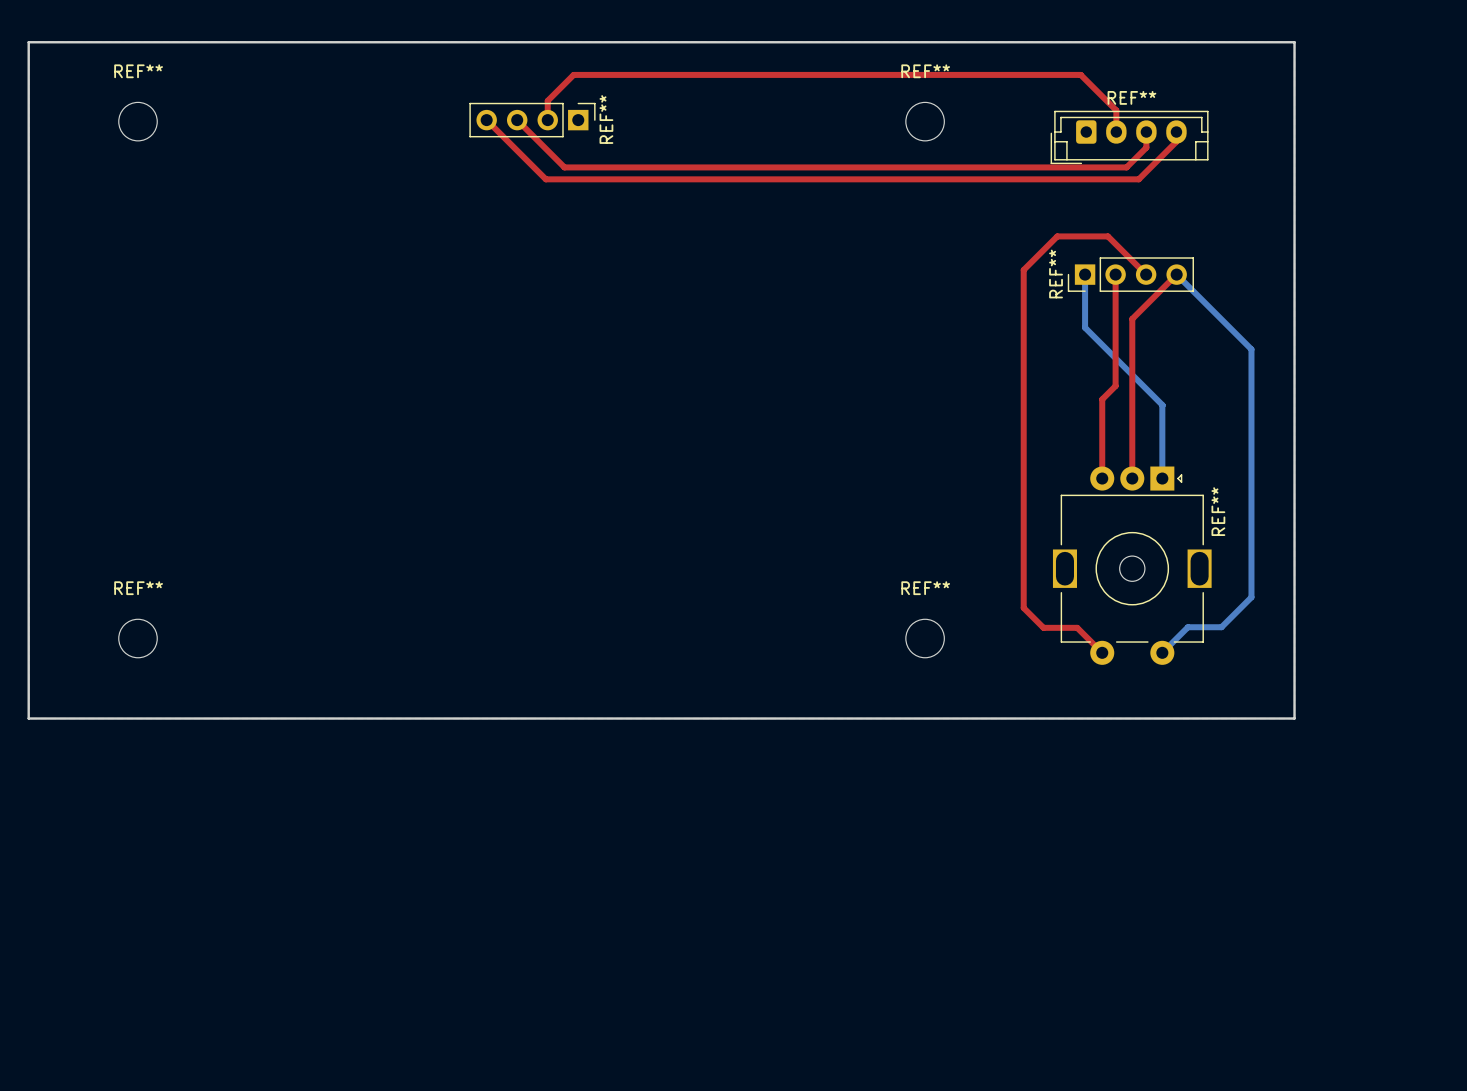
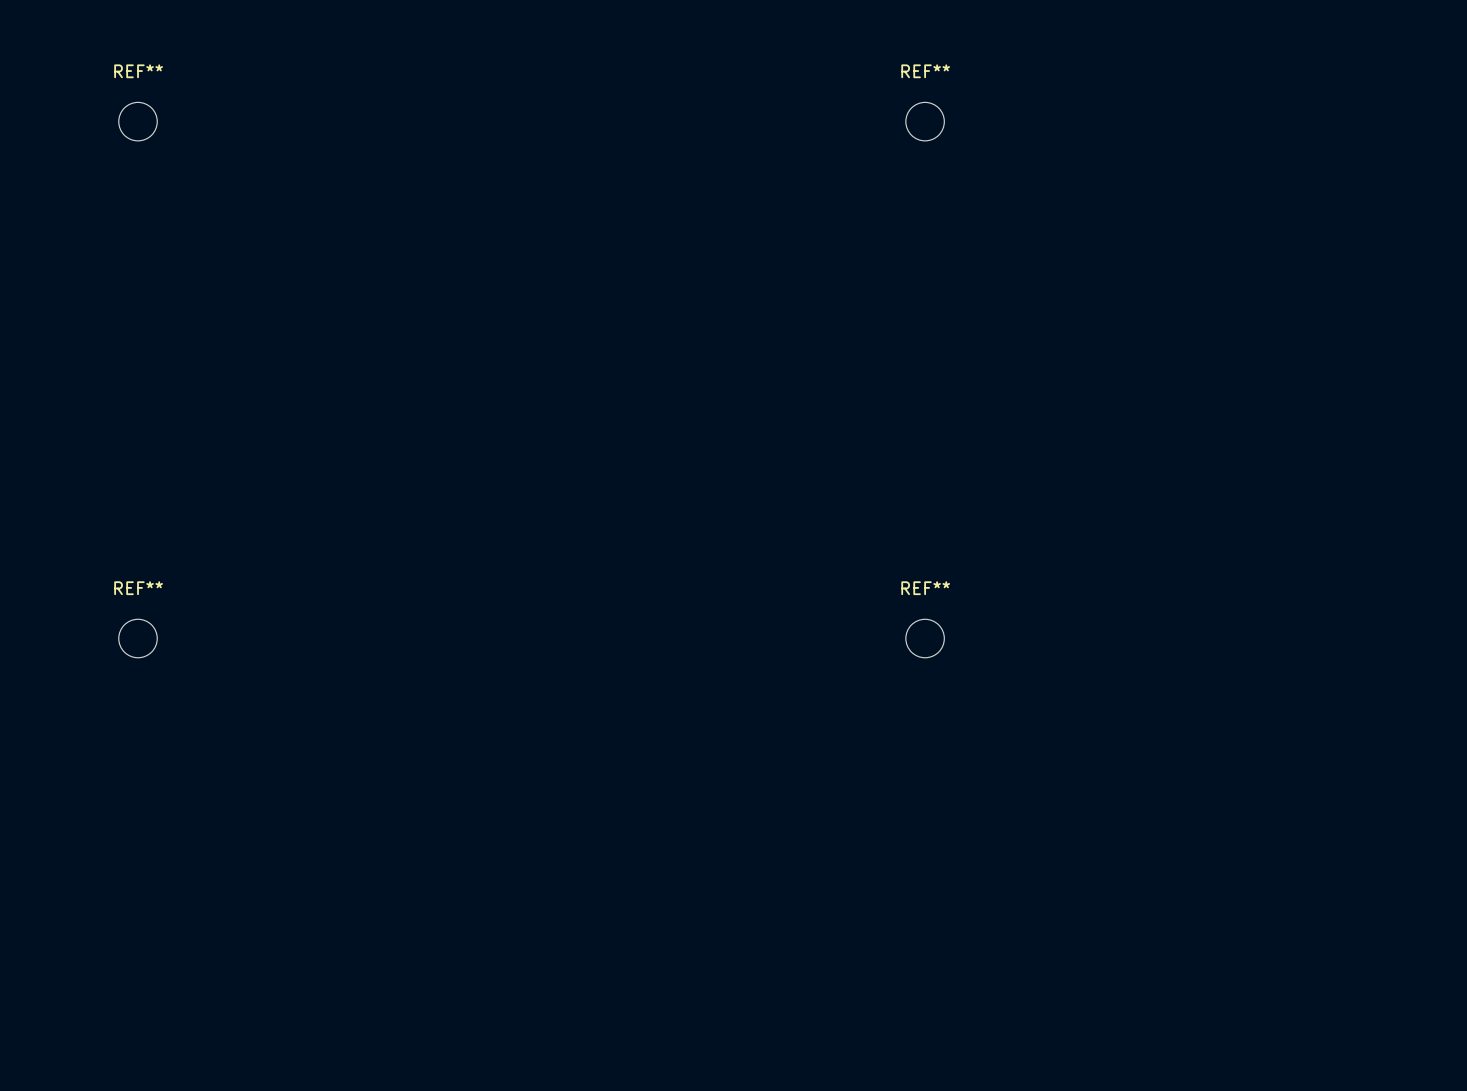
board edge: (28, 42) (1294, 42) (1294, 718) (28, 718) (28, 42) -> none
top track: (486, 120) (545, 179) (1138, 179) (1176, 141) (1176, 132) -> none
top track: (517, 120) (564, 167) (1126, 167) (1146, 147) (1146, 132) -> none
REF**: (532, 120) -> none
top track: (547, 120) (547, 100) (573, 74) (1080, 74) (1116, 110) (1116, 132) -> none
REF**: (1129, 137) -> none
bottom track: (1085, 274) (1085, 327) (1162, 405) (1162, 478) -> none
top track: (1115, 274) (1115, 386) (1102, 399) (1102, 478) -> none
REF**: (1130, 274) -> none
top track: (1146, 274) (1107, 236) (1057, 236) (1023, 270) (1023, 607) (1043, 627) (1077, 627) (1102, 652) -> none
top track: (1176, 274) (1132, 318) (1132, 478) -> none
bottom track: (1176, 274) (1251, 349) (1251, 597) (1221, 627) (1187, 627) (1162, 652) -> none
REF**: (1132, 565) -> none

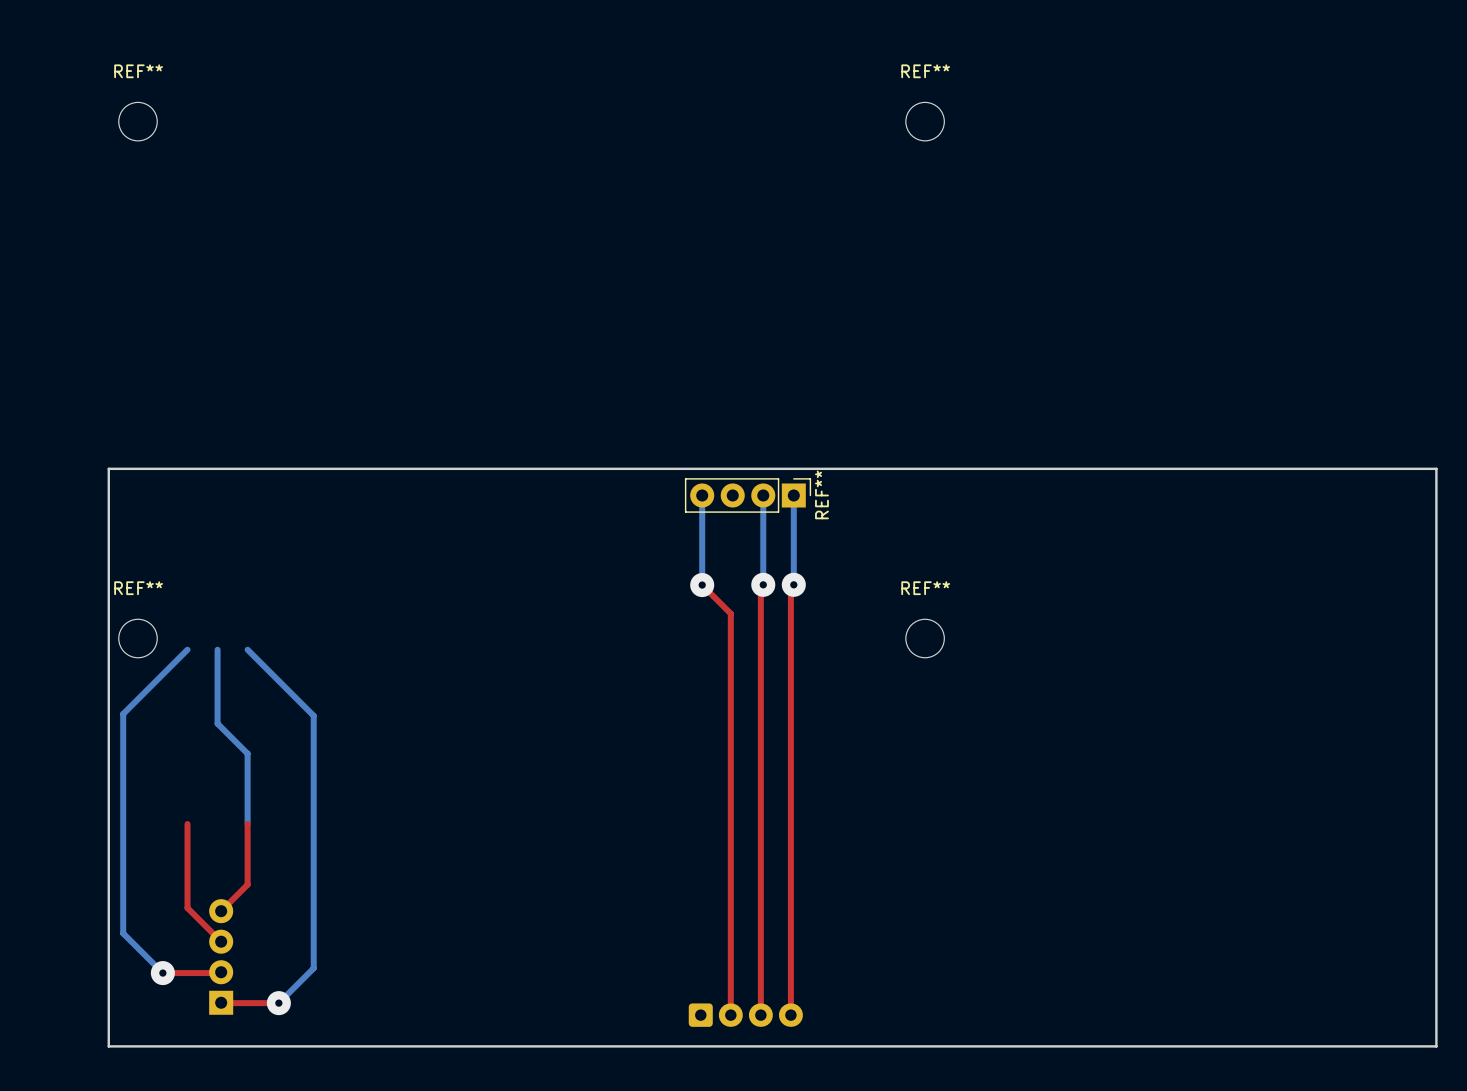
board edge: none -> (108, 468) (1436, 468) (1436, 1046) (108, 1046) (108, 468)
bottom track: none -> (702, 495) (702, 585)
REF**: none -> (748, 495)
bottom track: none -> (763, 495) (763, 584)
bottom track: none -> (793, 495) (793, 584)
top track: none -> (763, 584) (760, 587) (760, 1015) (763, 1012)
via: none -> (763, 584)
top track: none -> (793, 584) (790, 587) (790, 1015)
via: none -> (793, 584)
top track: none -> (702, 585) (730, 613) (730, 1015)
via: none -> (702, 585)
bottom track: none -> (187, 649) (123, 714) (123, 933) (162, 973)
bottom track: none -> (217, 649) (217, 723) (247, 753) (247, 824)
bottom track: none -> (247, 649) (313, 715) (313, 968) (278, 1003)
top track: none -> (187, 824) (187, 908) (221, 941)
top track: none -> (247, 824) (247, 884) (221, 911)
part: none -> (221, 956)
top track: none -> (221, 972) (162, 973)
via: none -> (162, 973)
top track: none -> (221, 1002) (278, 1003)
via: none -> (278, 1003)
part: none -> (745, 1015)

